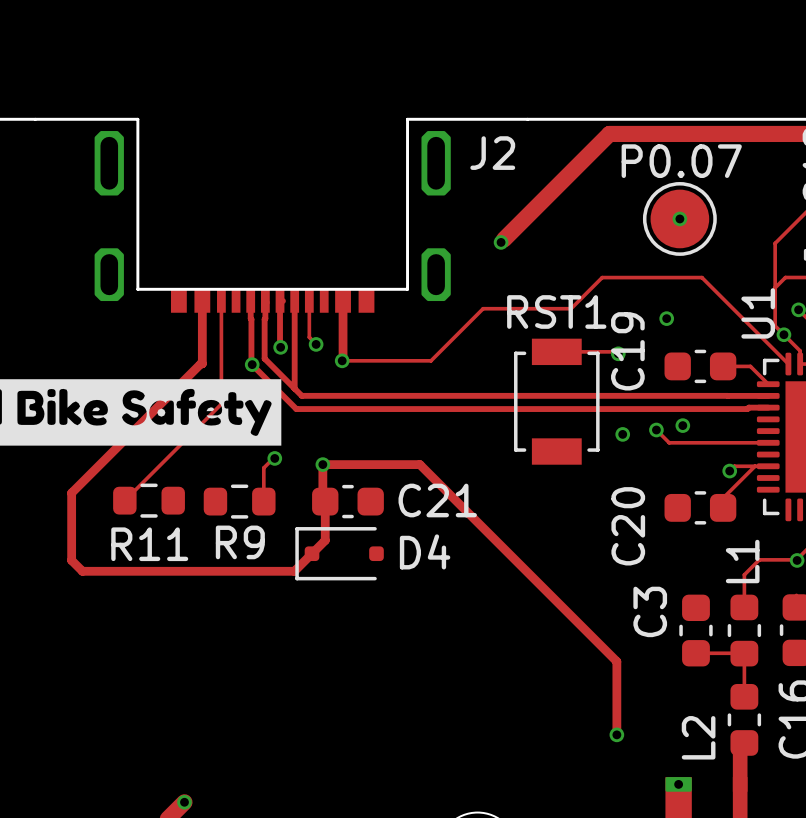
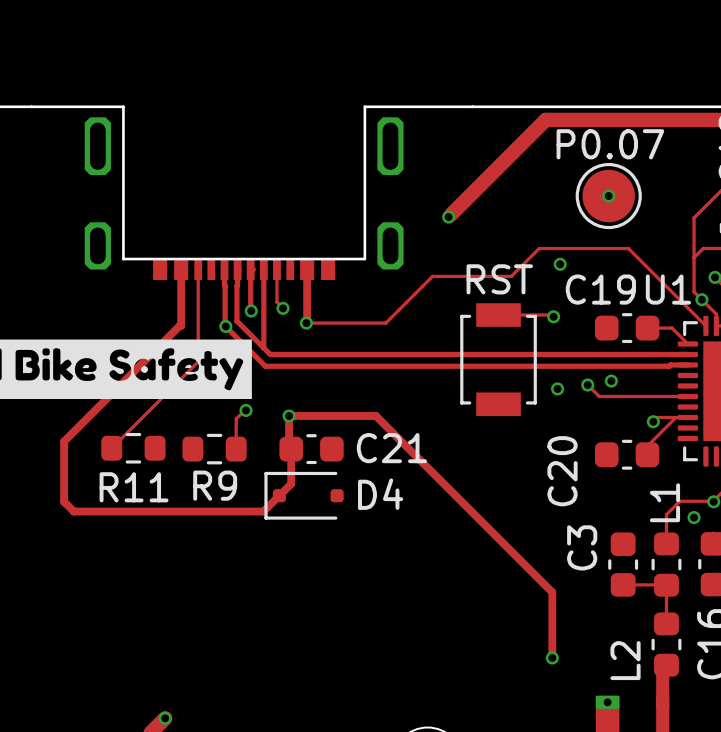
J2 name: J2 (492, 153) -> none
RST1 name: RST1 (556, 311) -> RST (499, 279)
U1 name rotation: 0° (758, 313) -> 90° clockwise (668, 289)
via position: (666, 318) -> (560, 264)
C19 name rotation: 0° (627, 351) -> 90° clockwise (600, 289)
via: none -> (694, 517)

